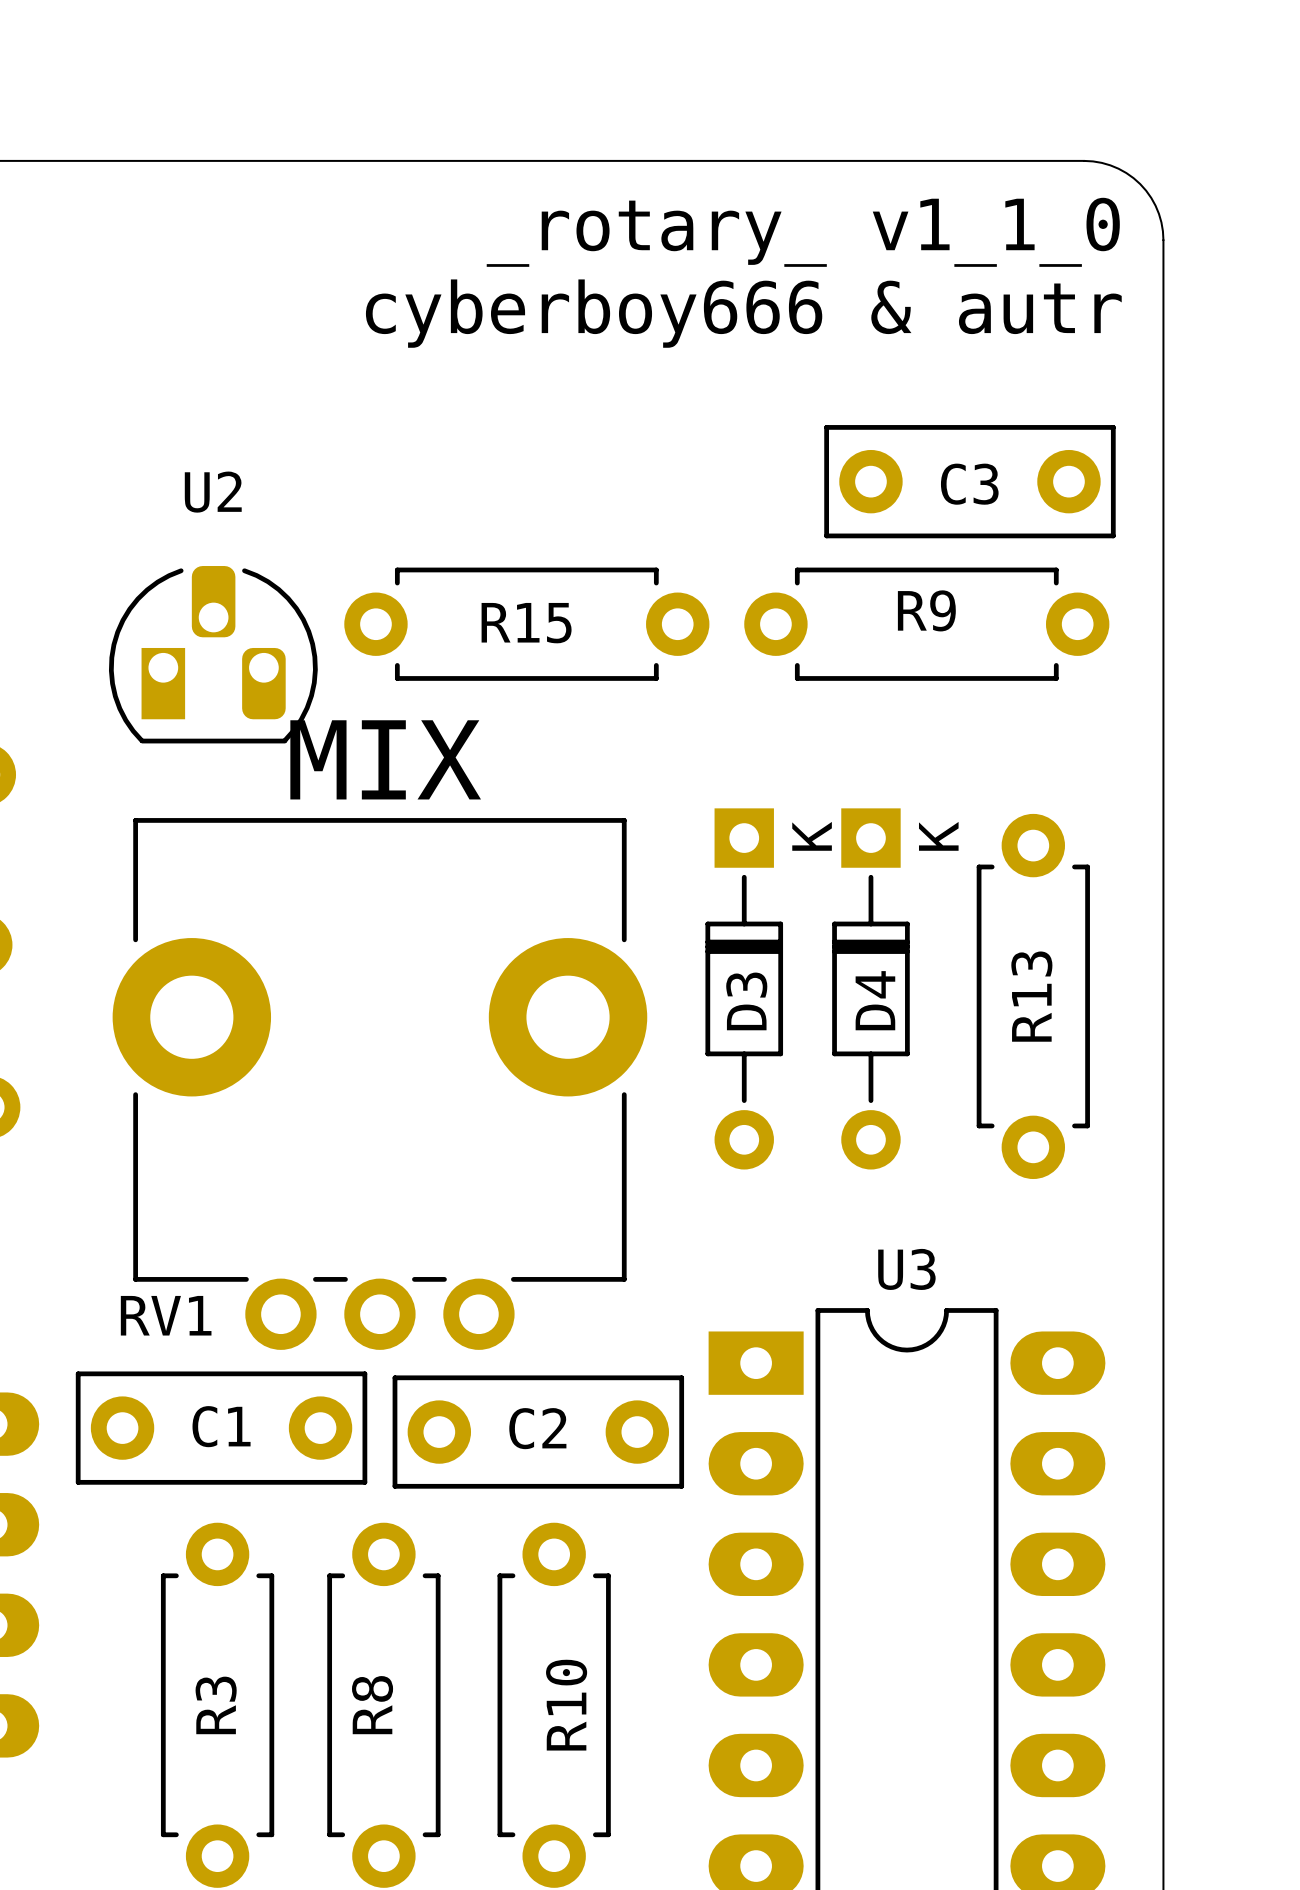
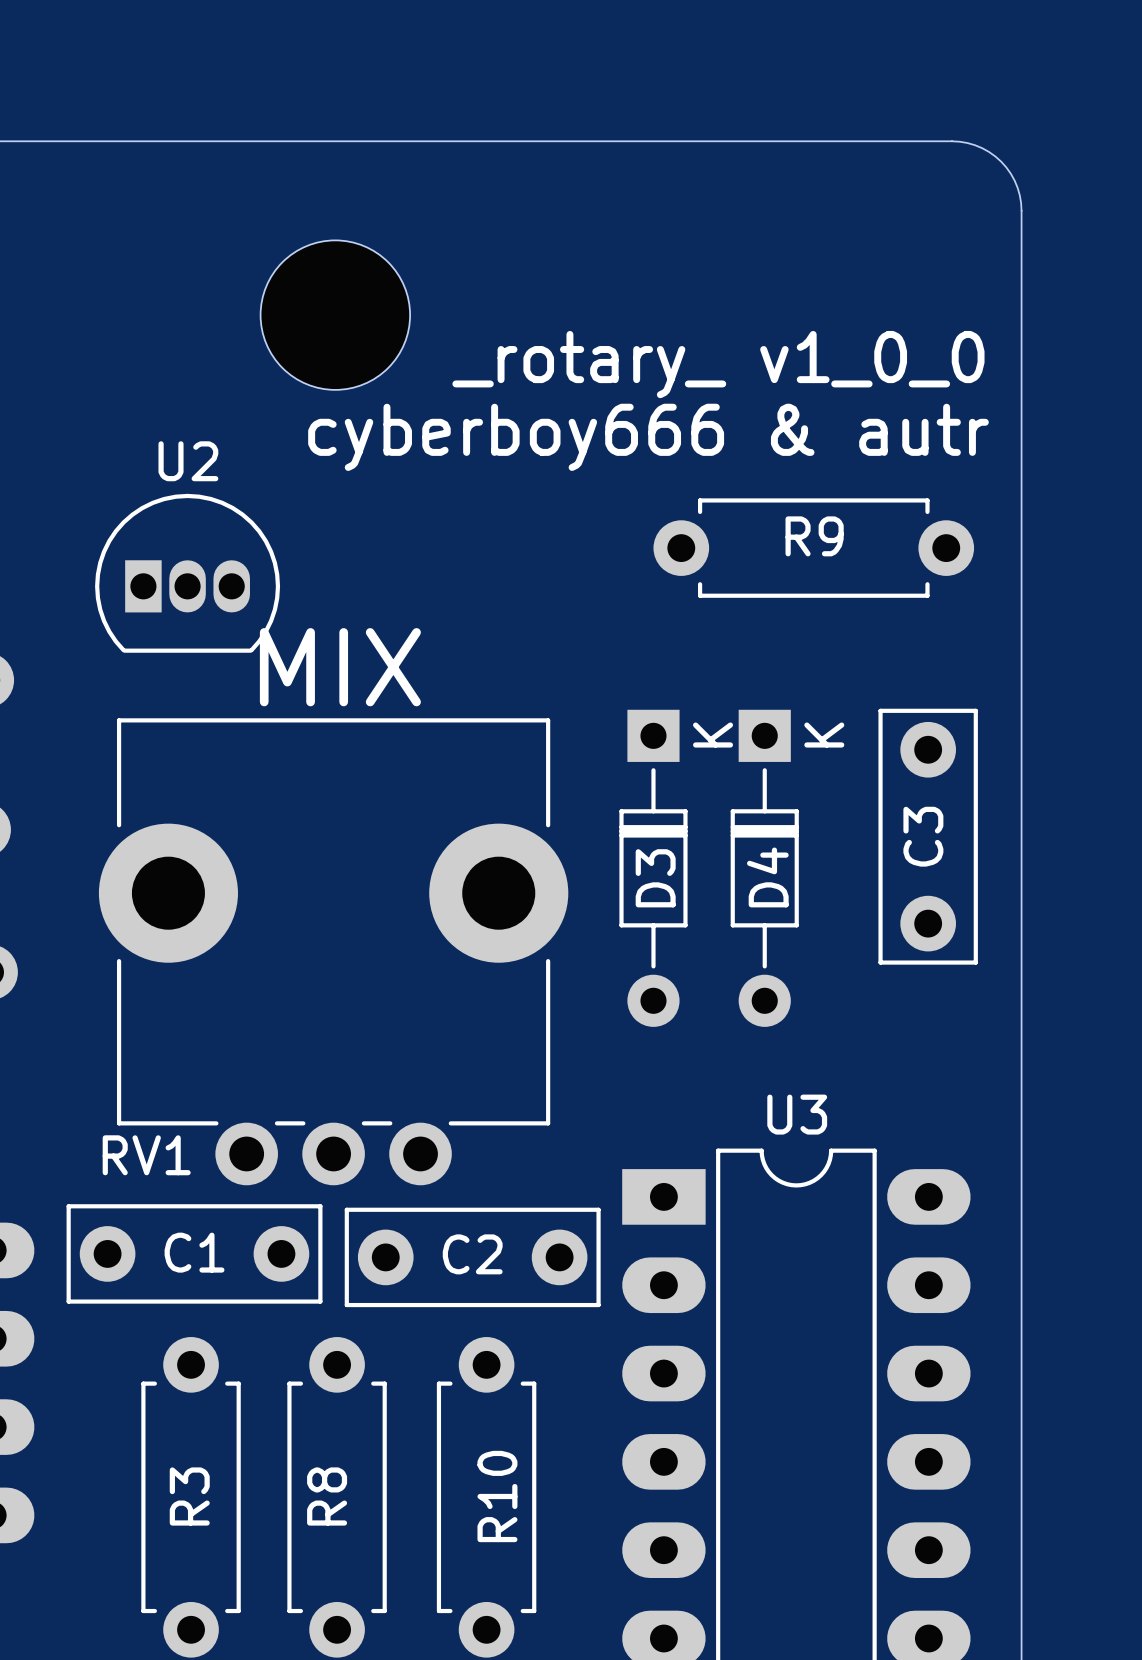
text: _rotary_ v1_1_0 (803, 232) -> none
text position: cyberboy666 & autr (743, 313) -> cyberboy666 & autr (648, 437)
part: none -> (335, 315)
text: none -> _rotary_ v1_0_0 (718, 364)
C3 rotation: 0° (969, 481) -> 90° clockwise (928, 836)
C3 position: (969, 481) -> (928, 836)
U2 footprint: [108, 566, 318, 744] -> [95, 493, 281, 653]
R15: (526, 624) -> none
R13: (1033, 996) -> none

